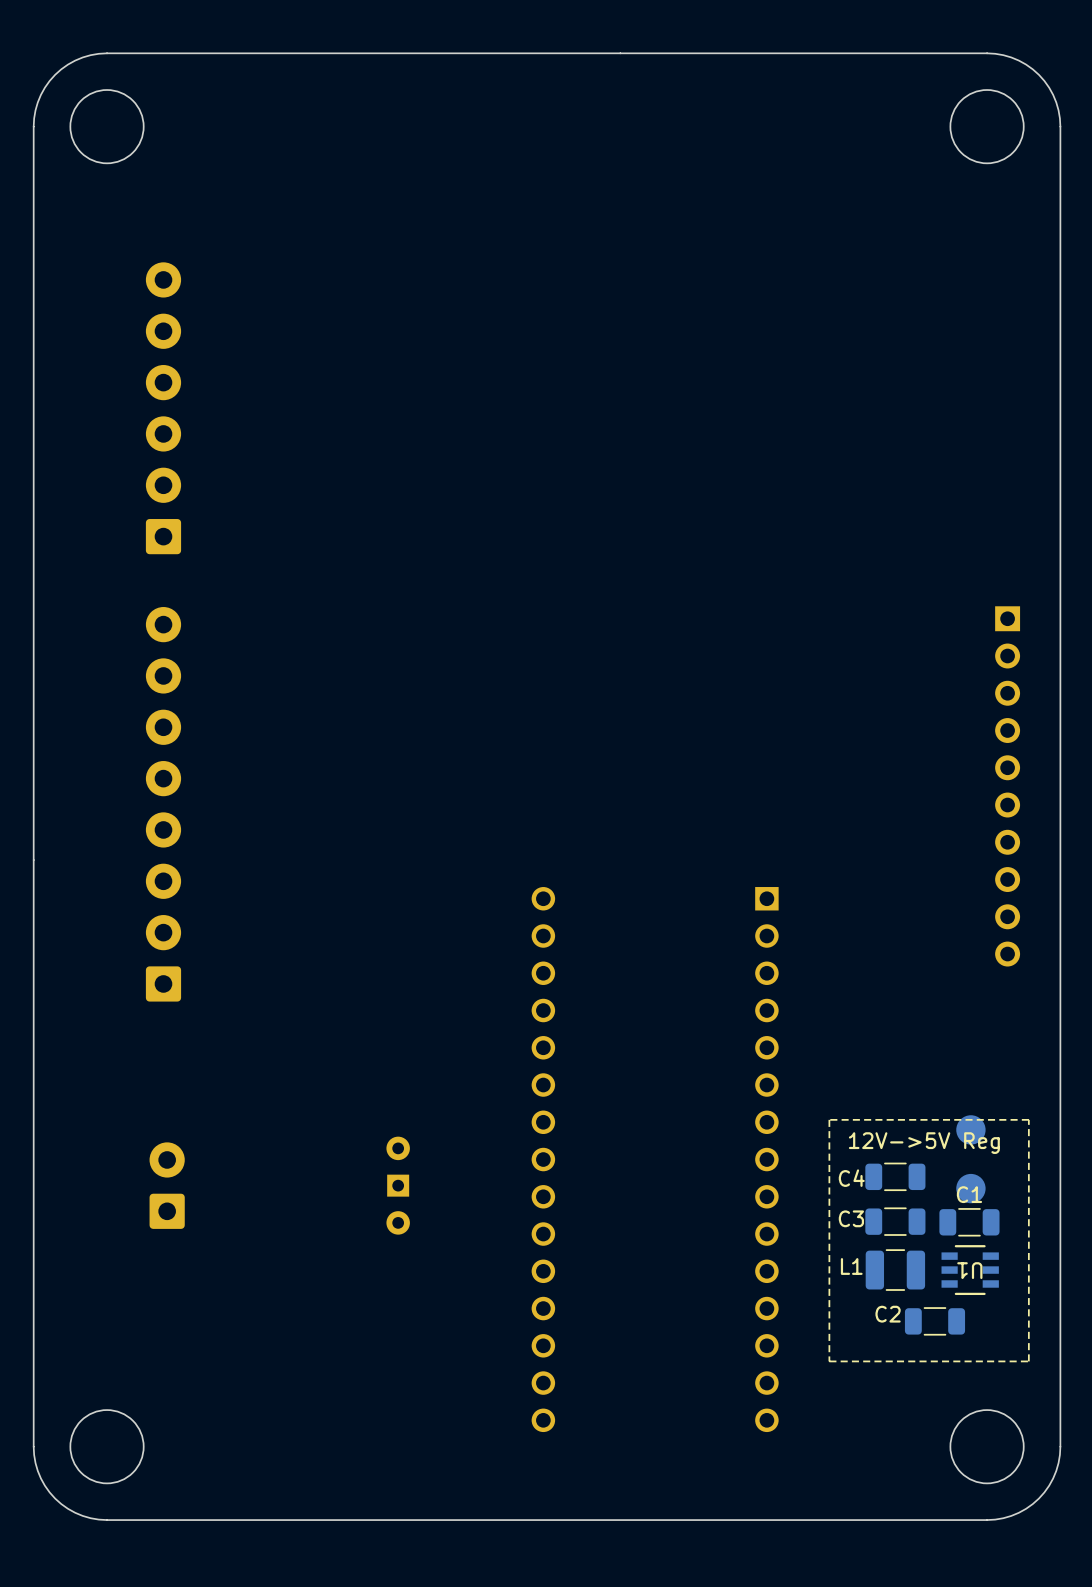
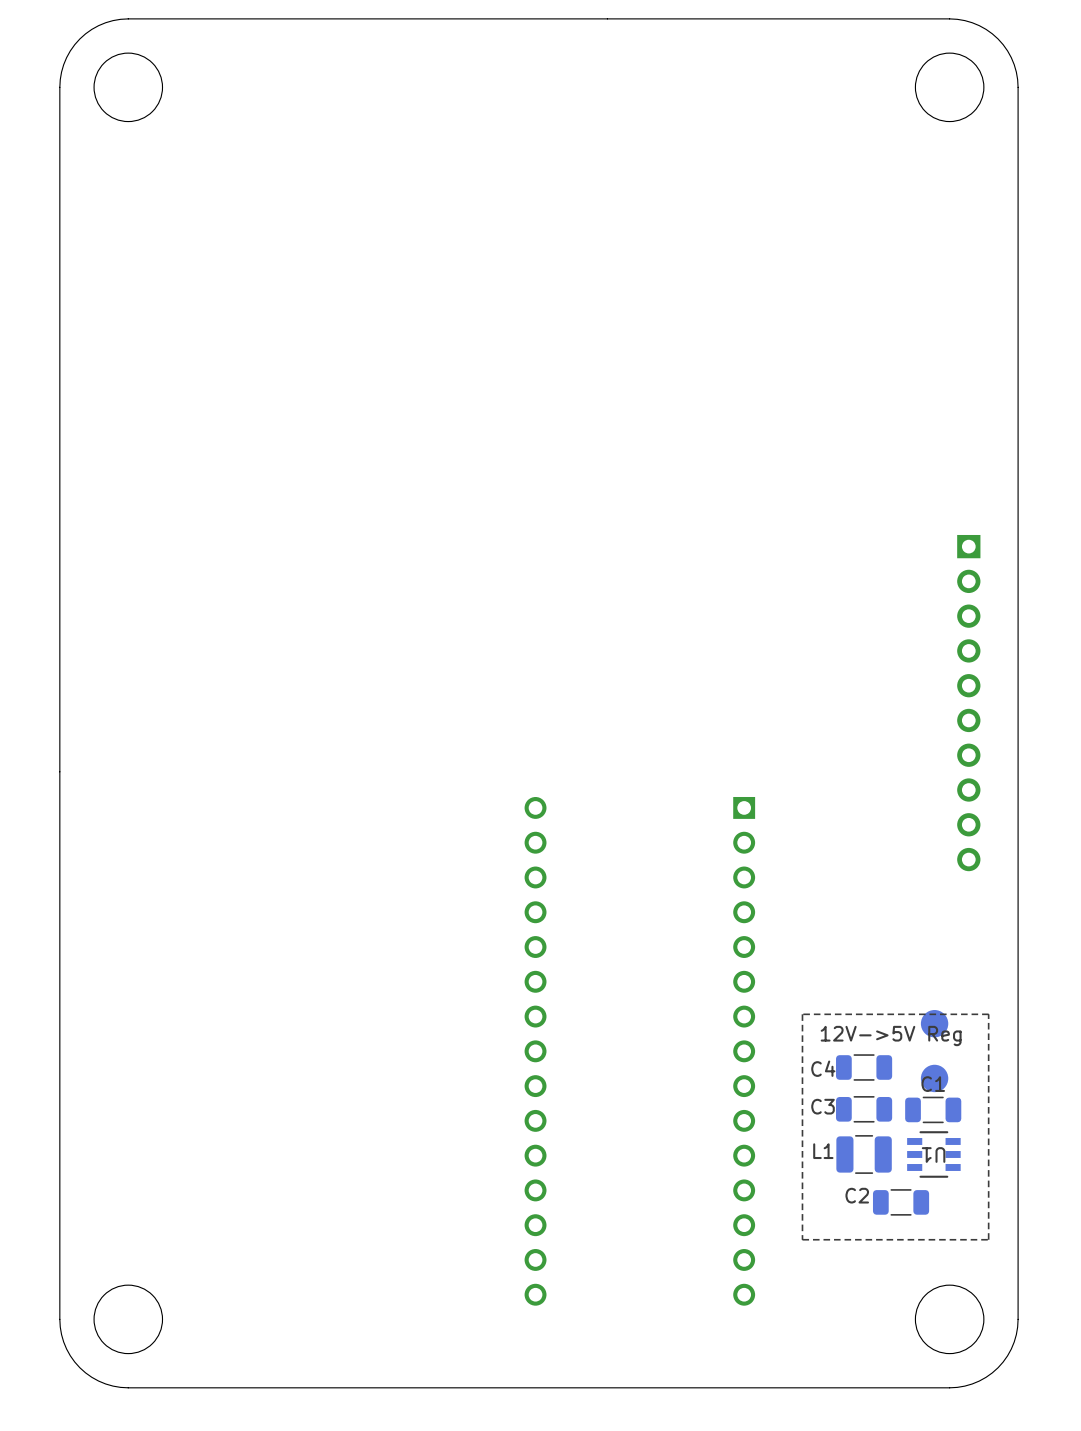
part: (163, 408) -> none
part: (163, 804) -> none
part: (167, 1185) -> none
part: (398, 1185) -> none

